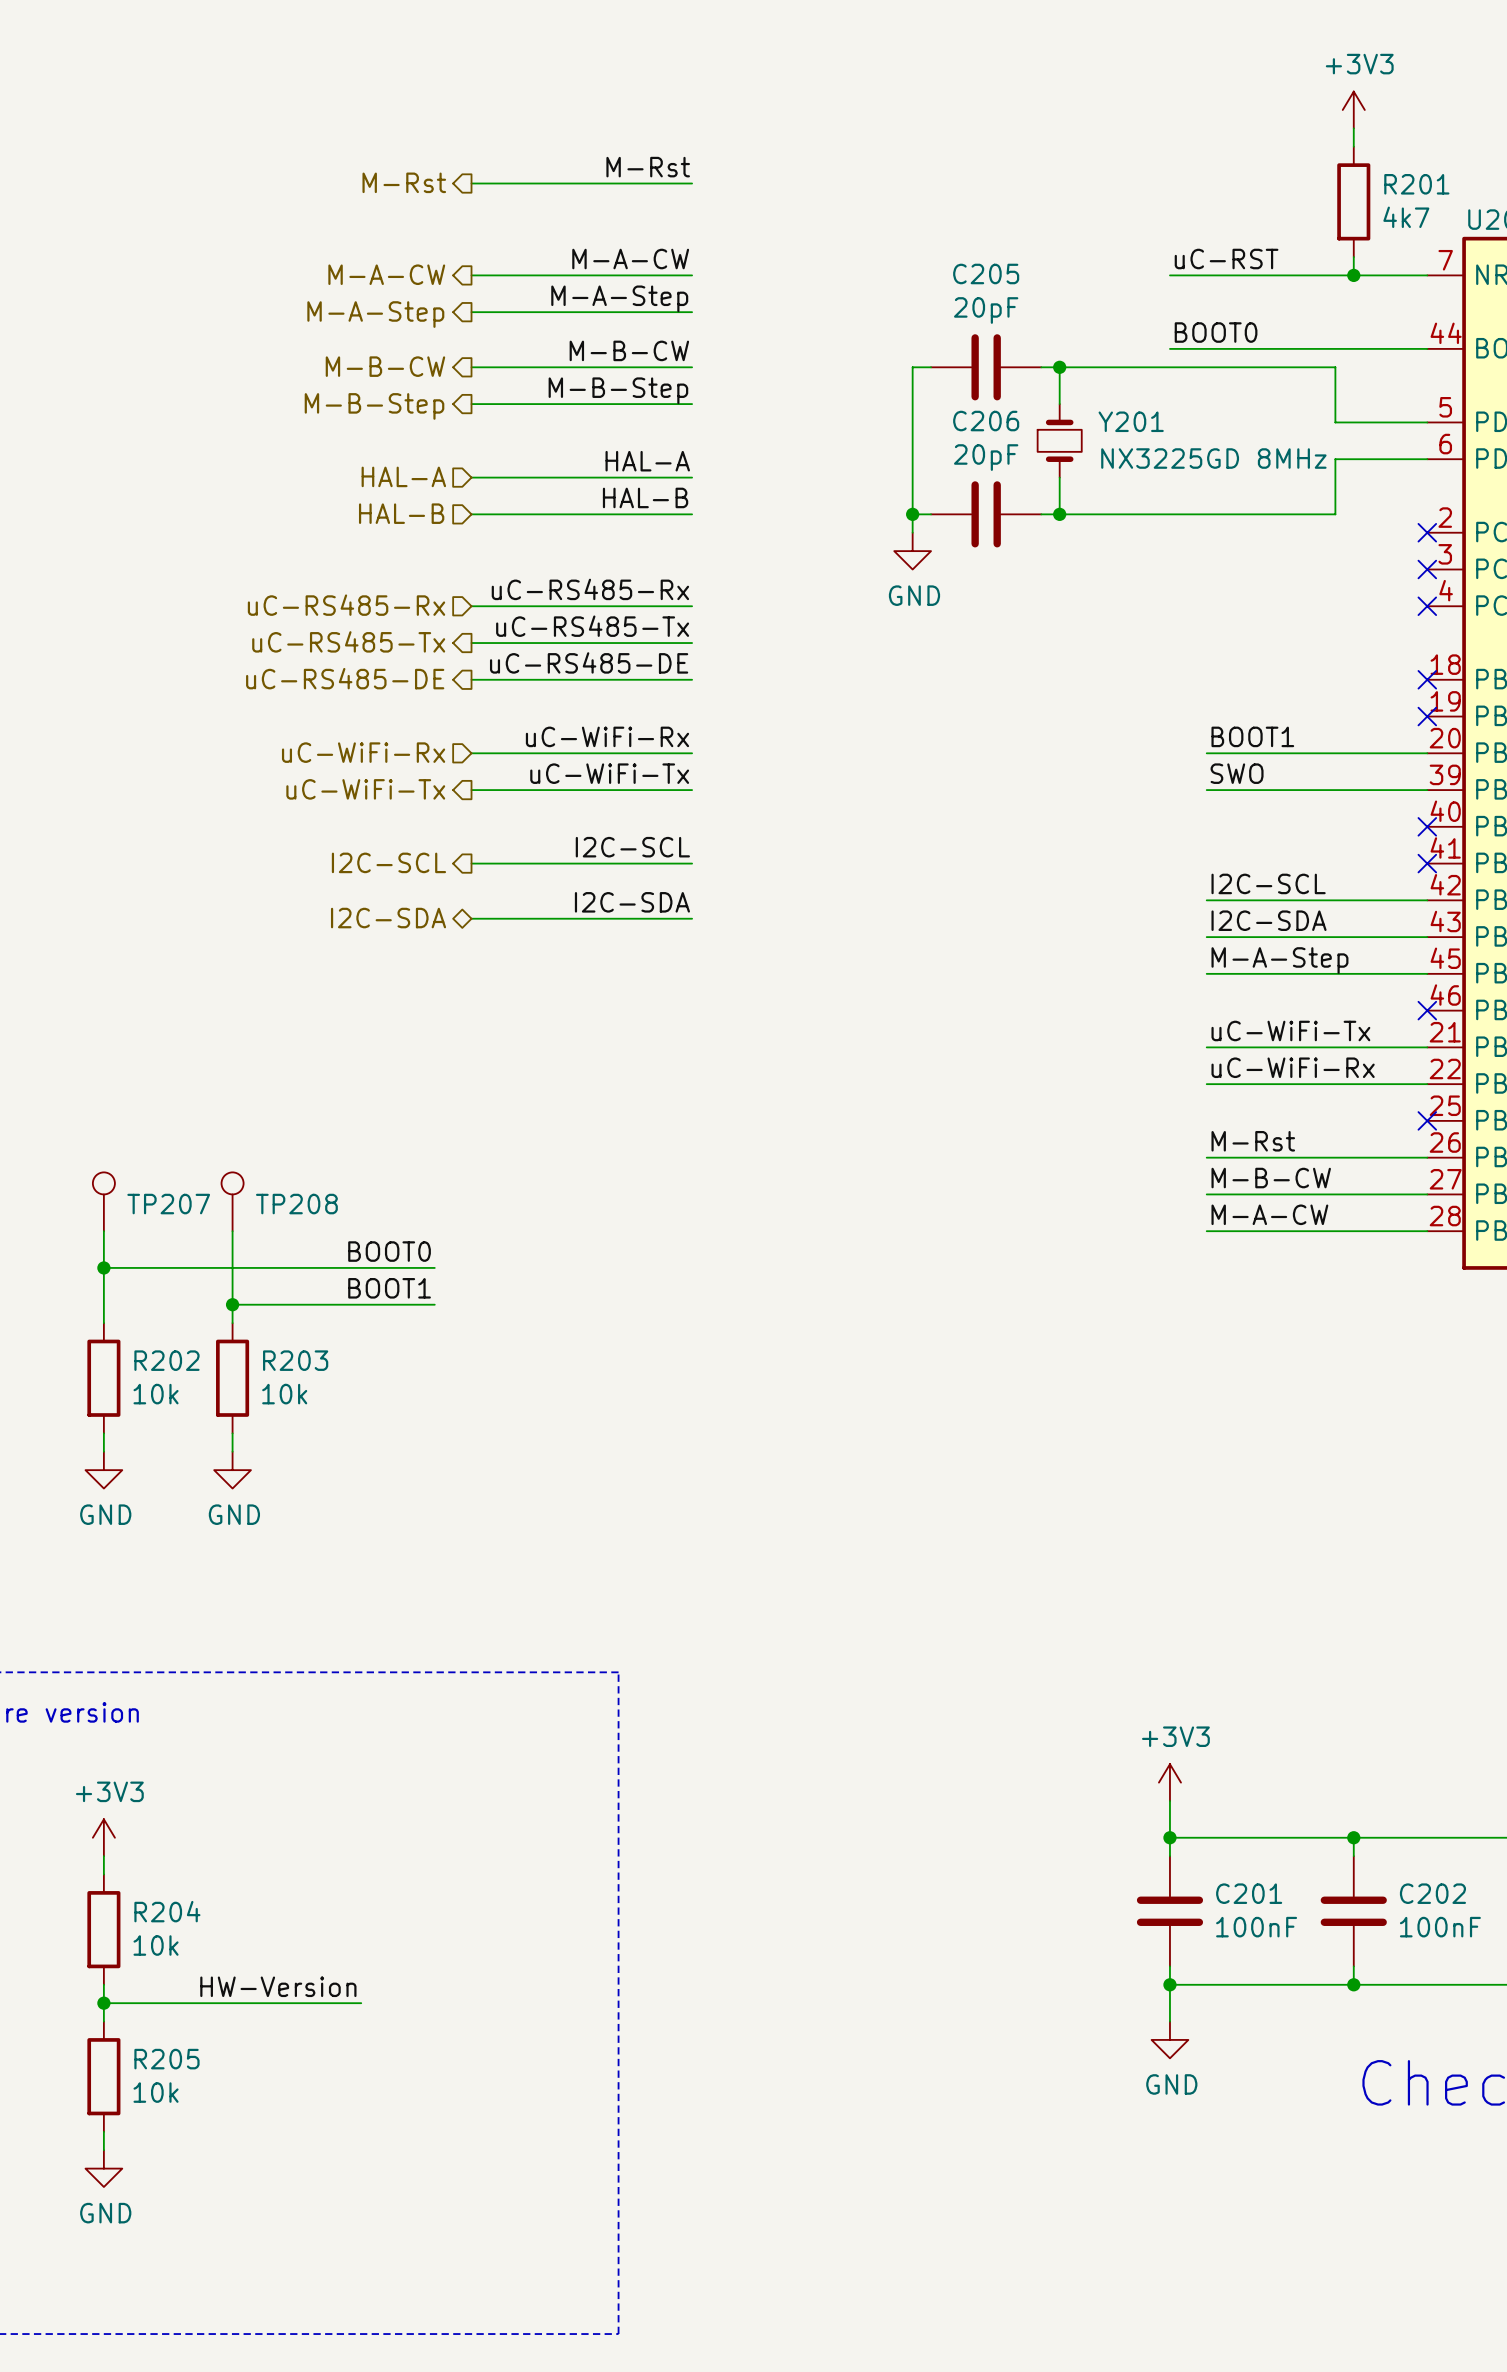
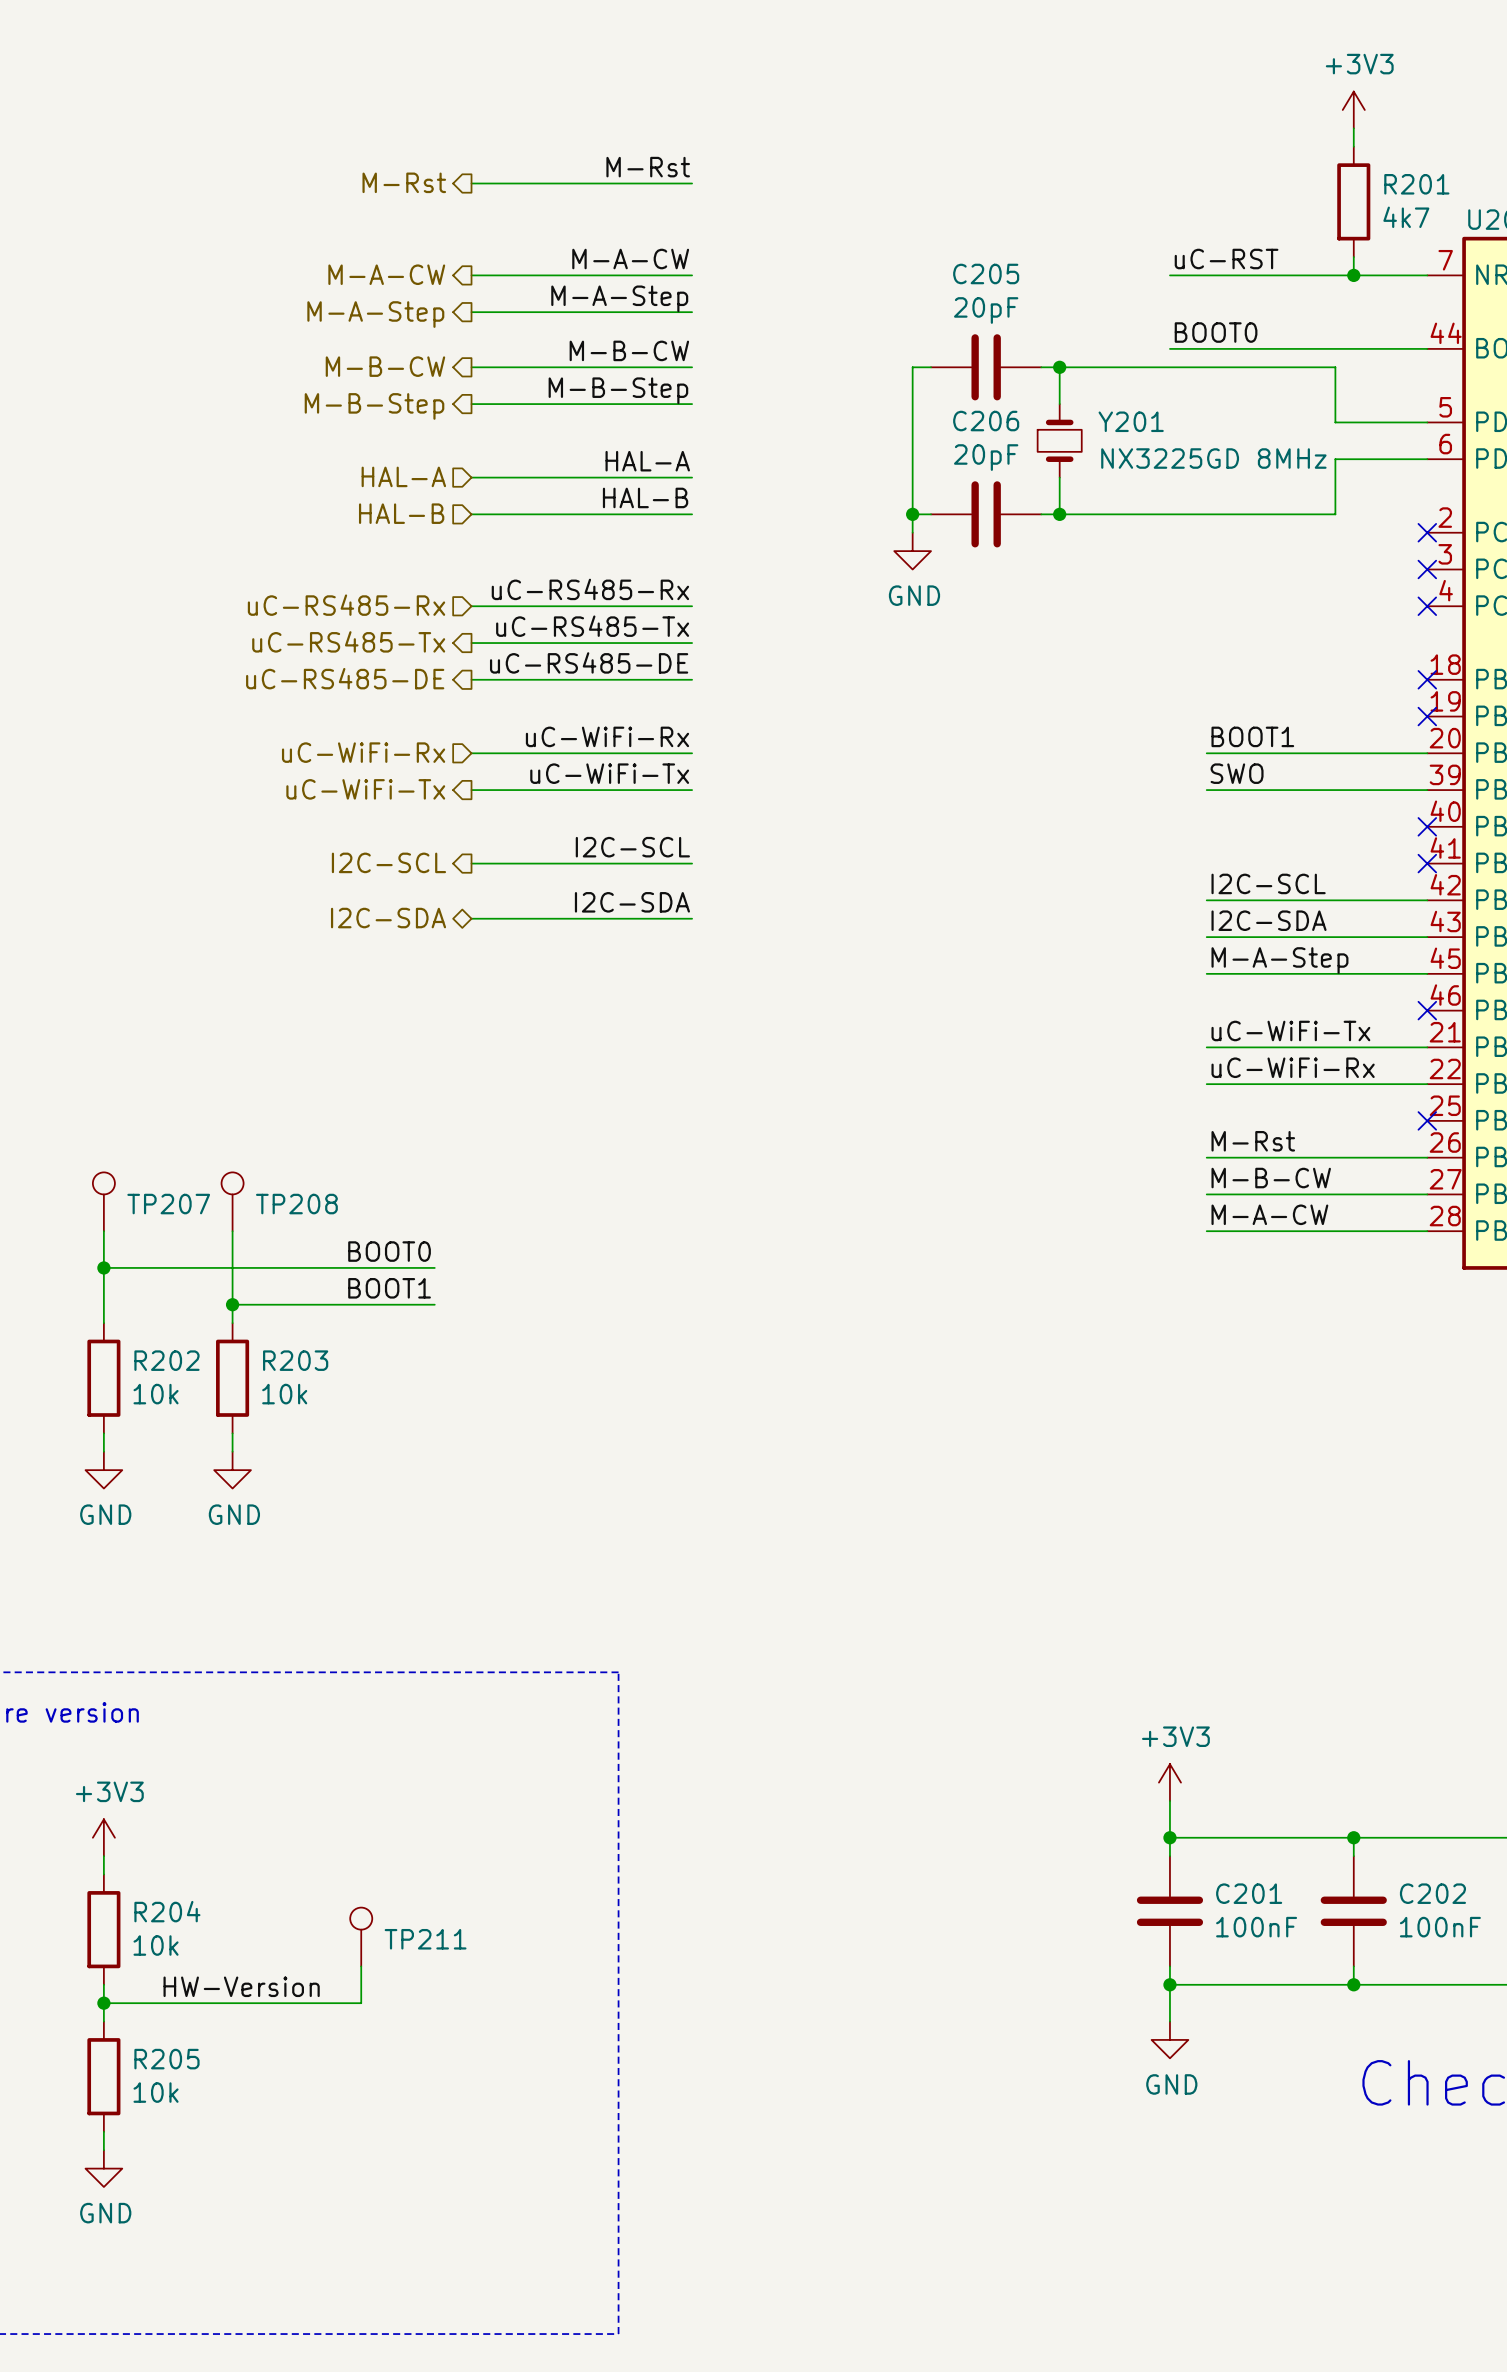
TP211: none -> (361, 1937)
wire: none -> (361, 1966) (361, 2003)
label position: HW-Version (278, 1986) -> HW-Version (241, 1986)

